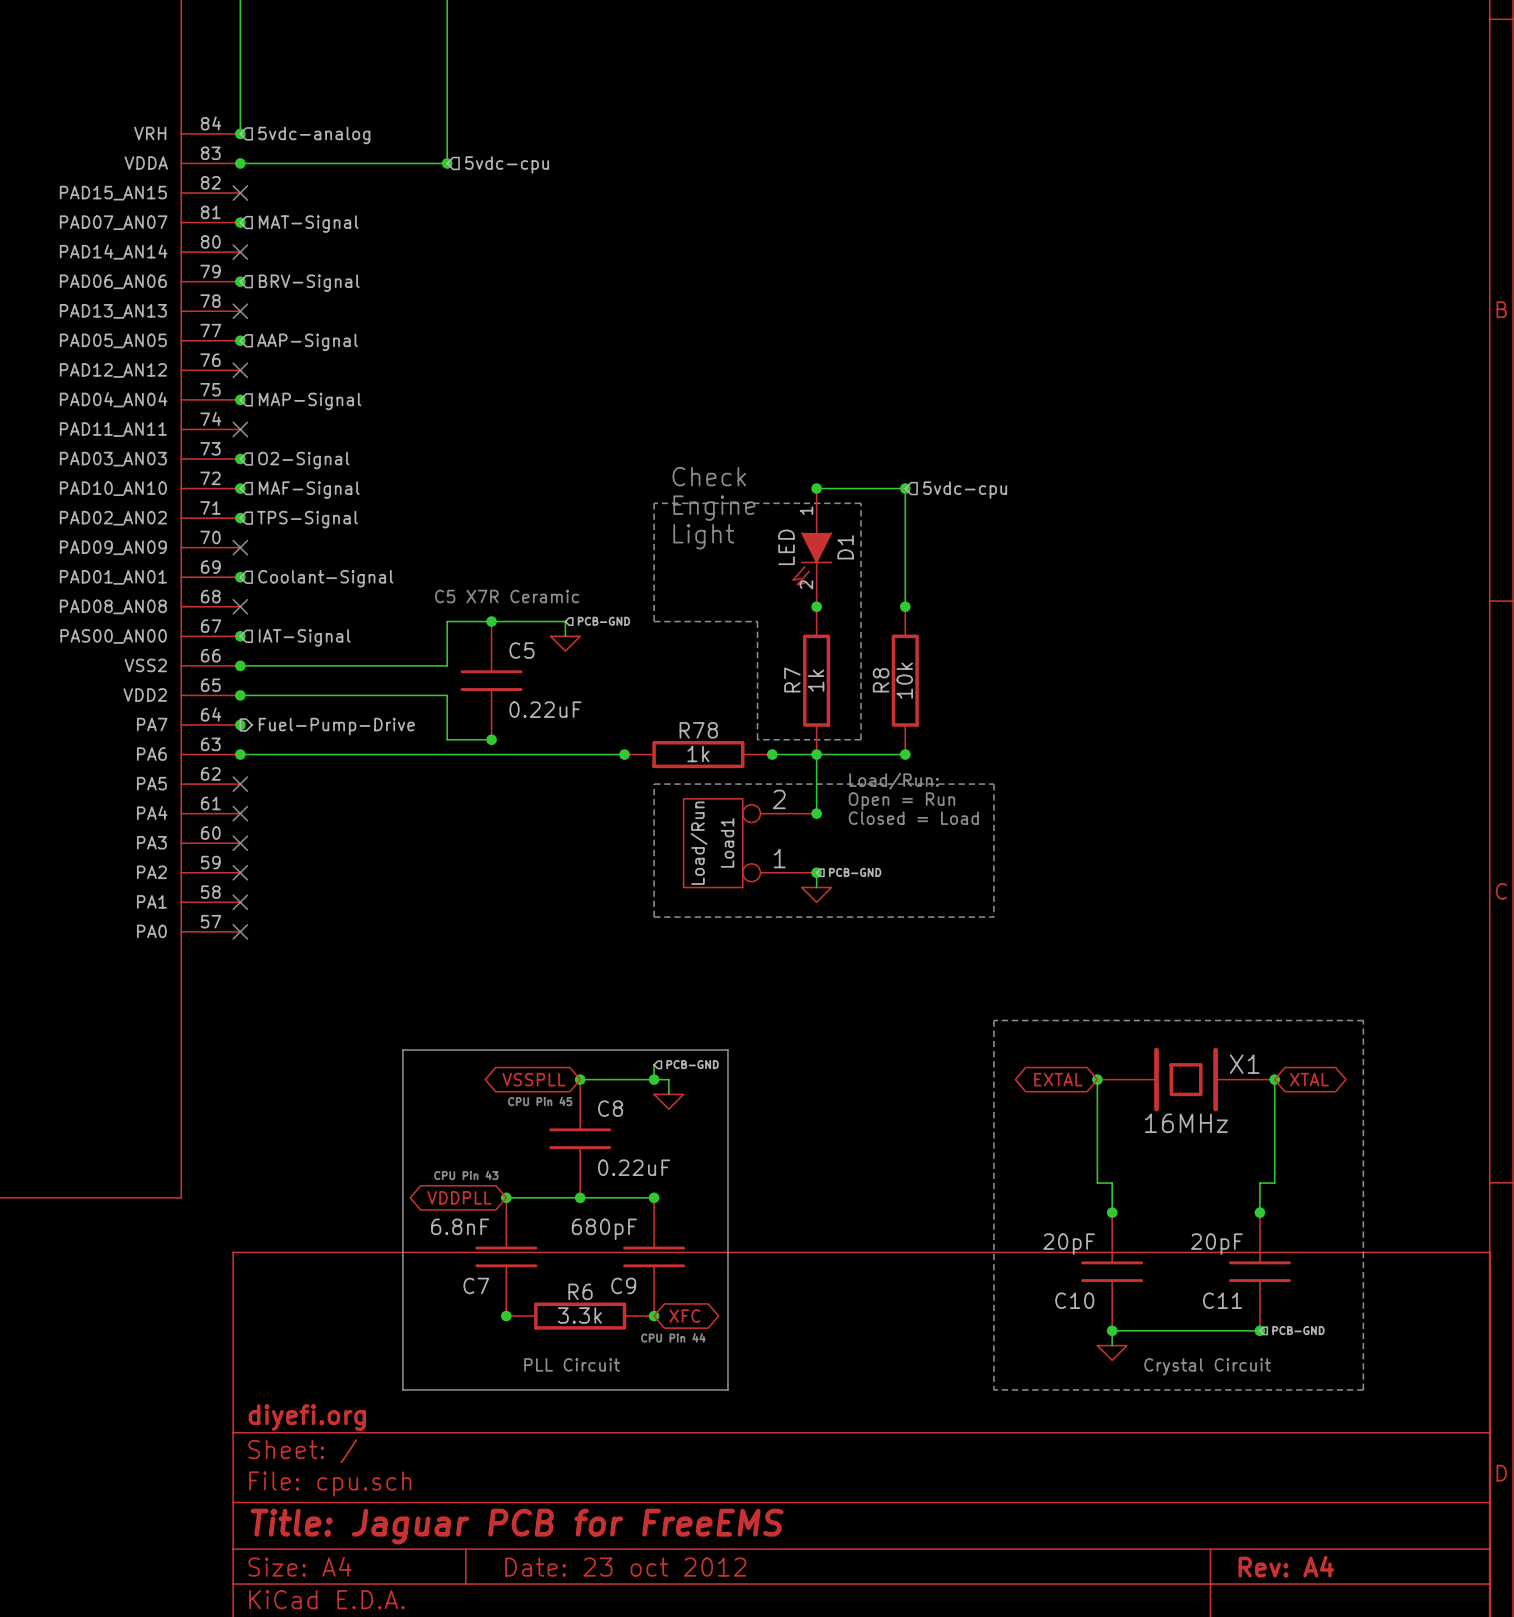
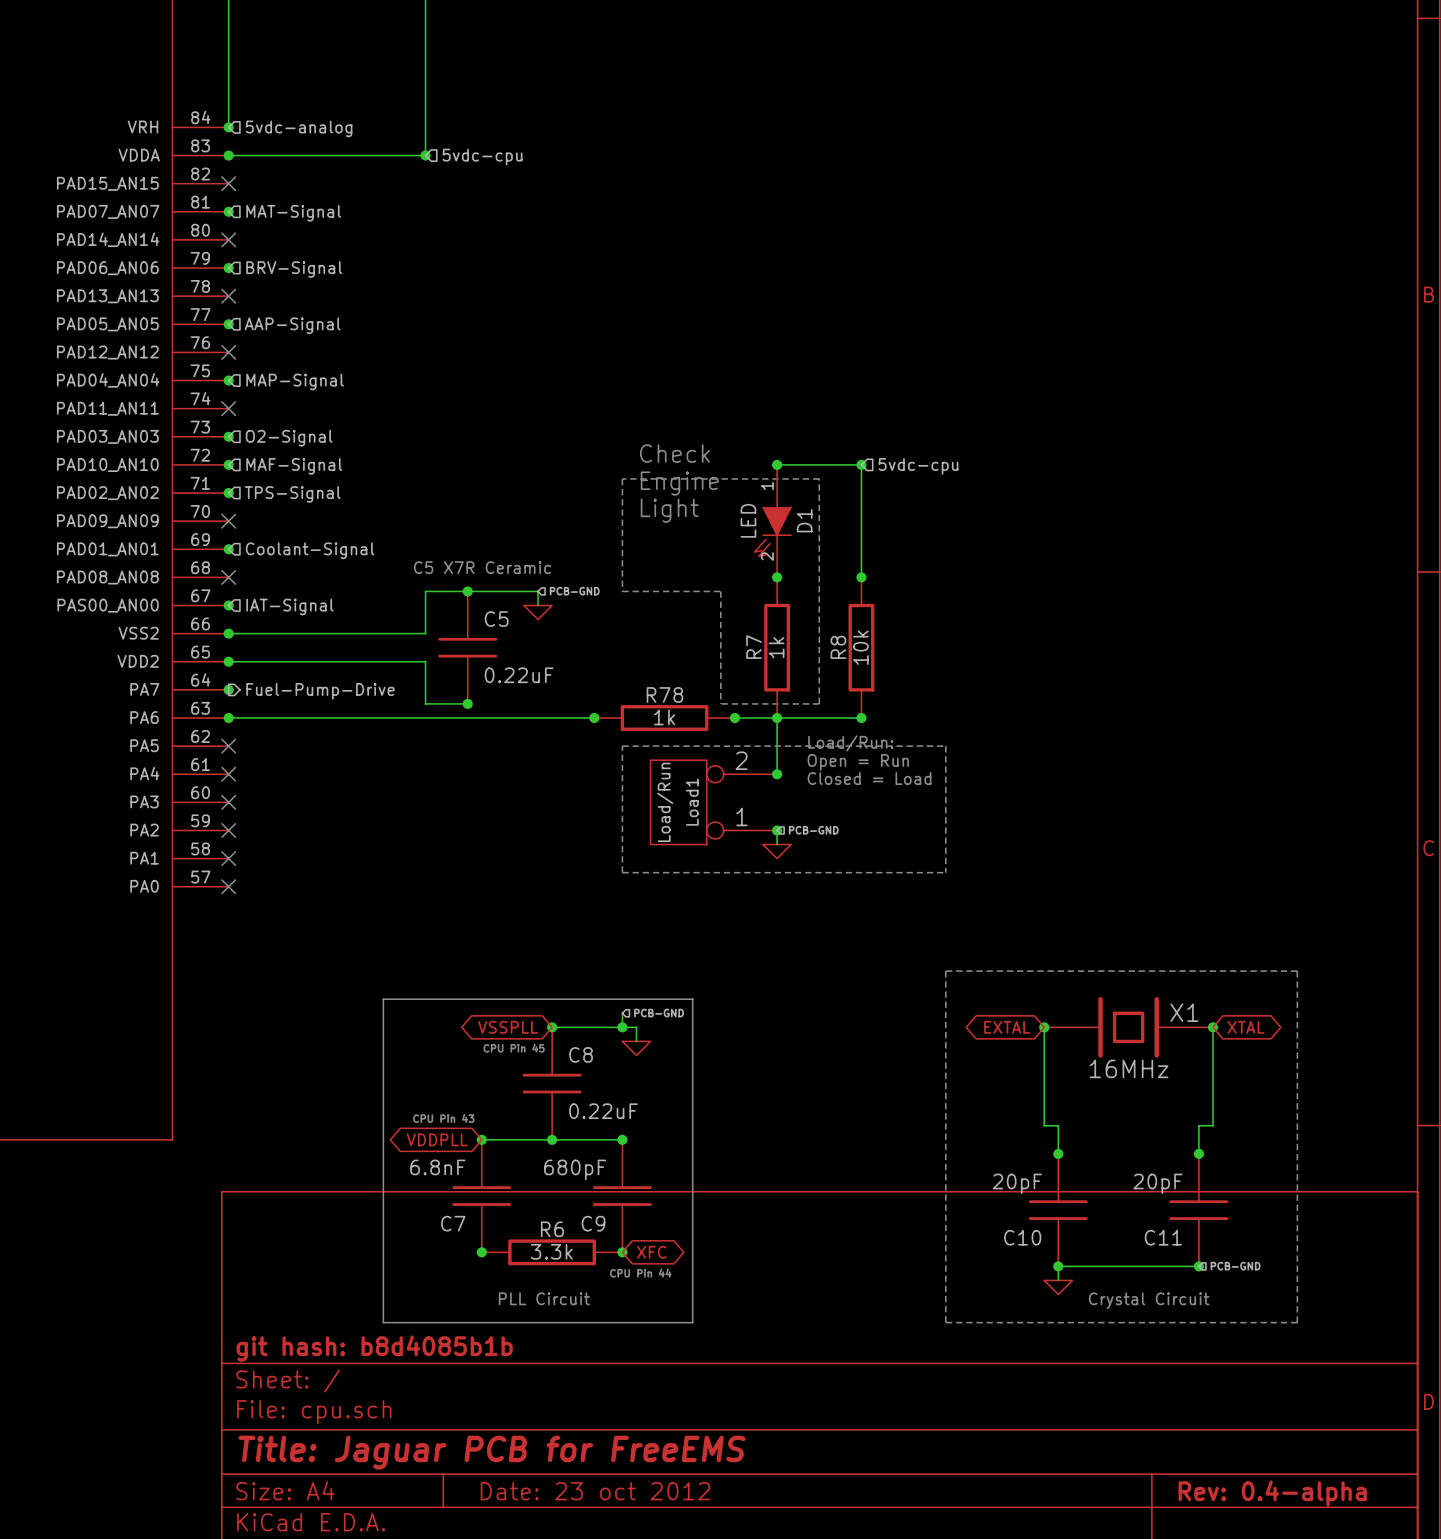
title block: diyefi.org (307, 1417) -> git hash: b8d4085b1b (374, 1348)
title block: Rev: A4 (1286, 1566) -> Rev: 0.4-alpha (1272, 1493)

